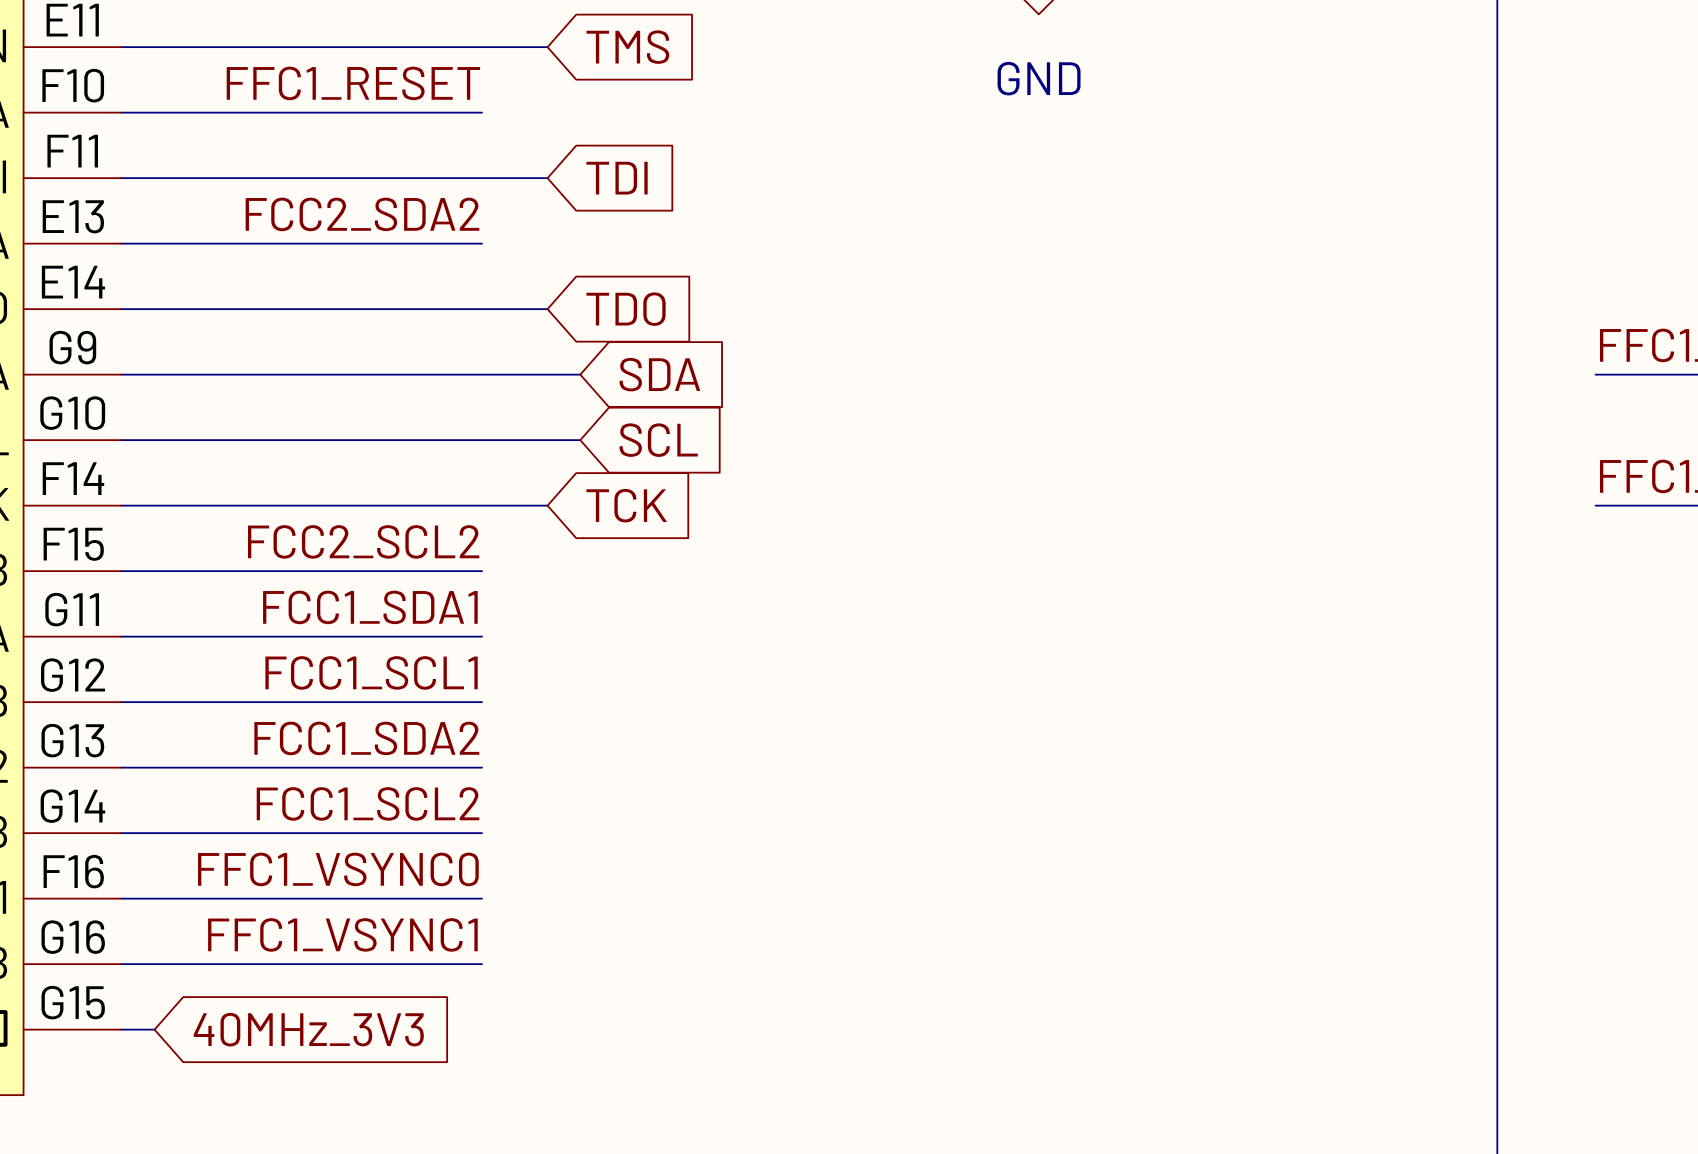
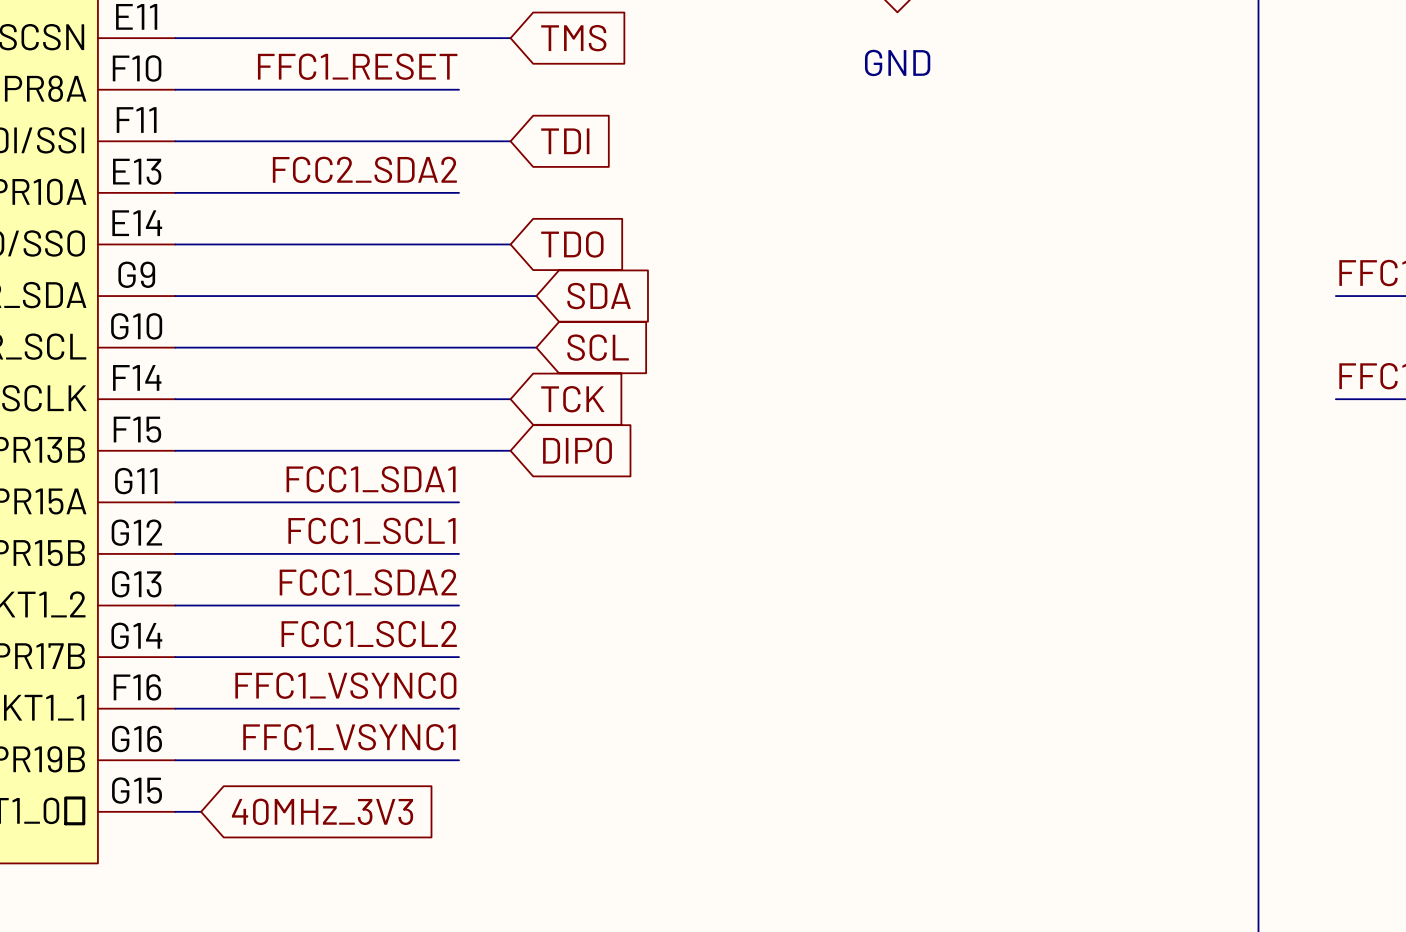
label: FCC2_SCL2 (363, 541) -> none
wire: none -> (459, 450) (510, 450)
global label: none -> DIP0 (577, 450)

